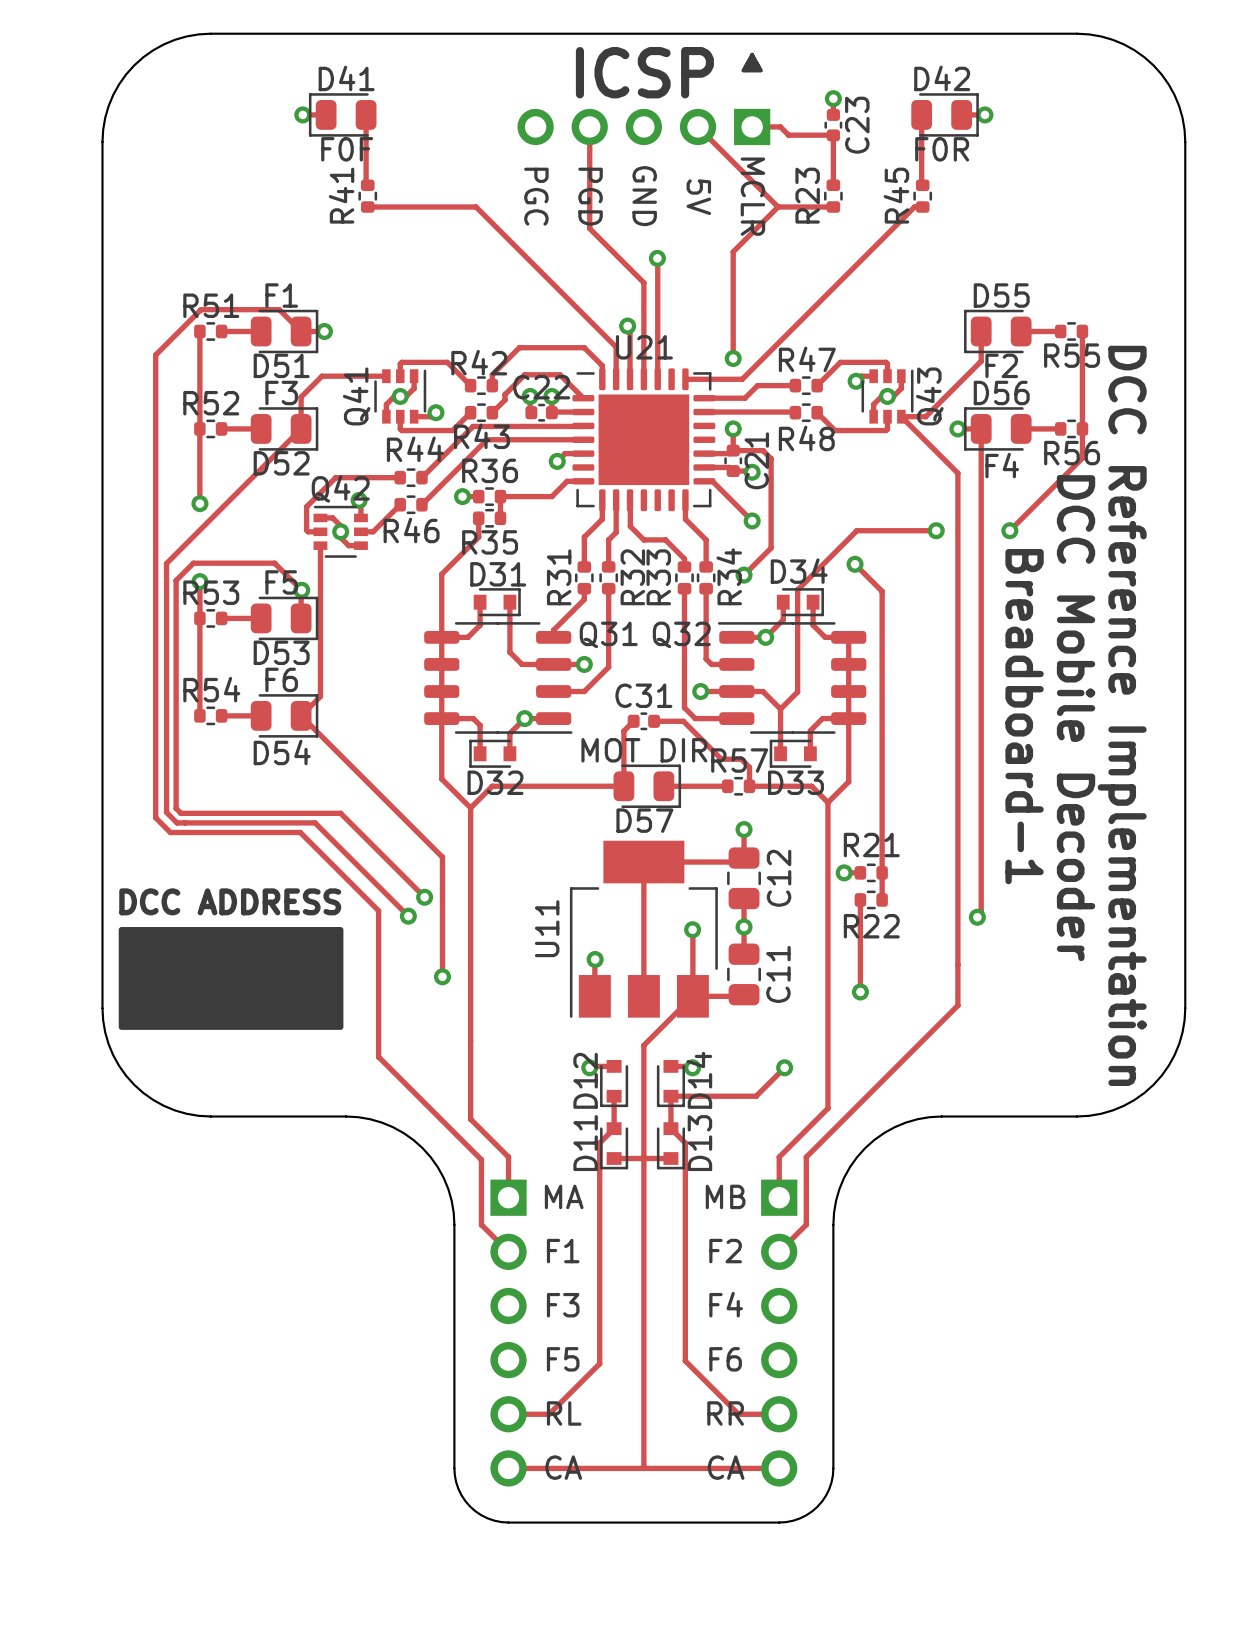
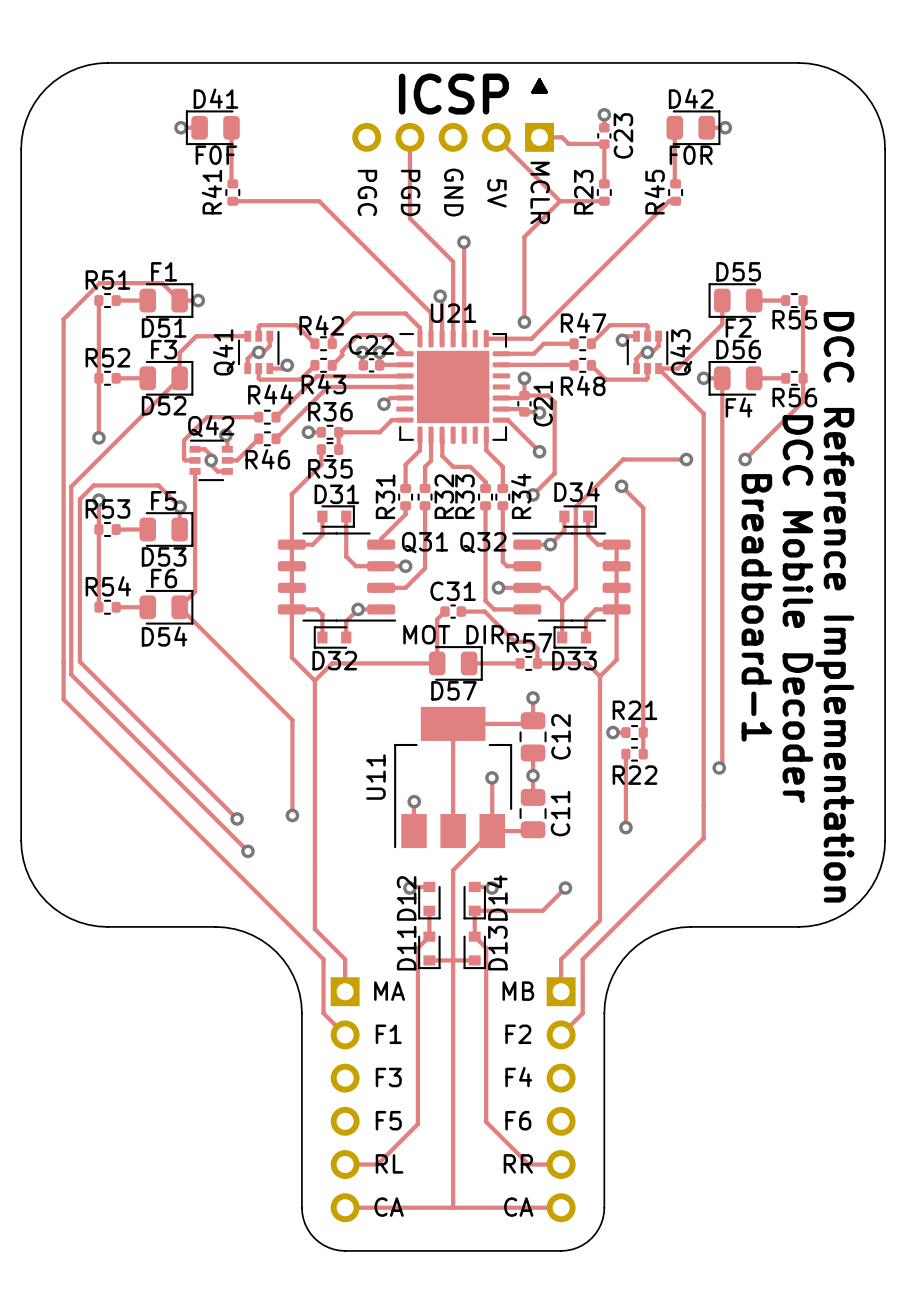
track: (166, 563) (166, 812) (177, 822) (315, 822) (408, 916) -> (72, 485) (71, 674) (247, 851)
track: (176, 784) (176, 808) (180, 813) (340, 813) (424, 897) -> (79, 661) (237, 818)
track: (155, 817) (170, 832) (300, 832) (378, 910) (378, 1056) (481, 1159) -> (63, 688) (63, 699) (323, 959) (323, 961)
via: (424, 897) -> none
text: DCC ADDRESS (230, 901) -> none
via: (408, 916) -> none
drawing: [118, 927, 344, 1030] -> none
via: none -> (237, 818)
via: none -> (247, 851)

